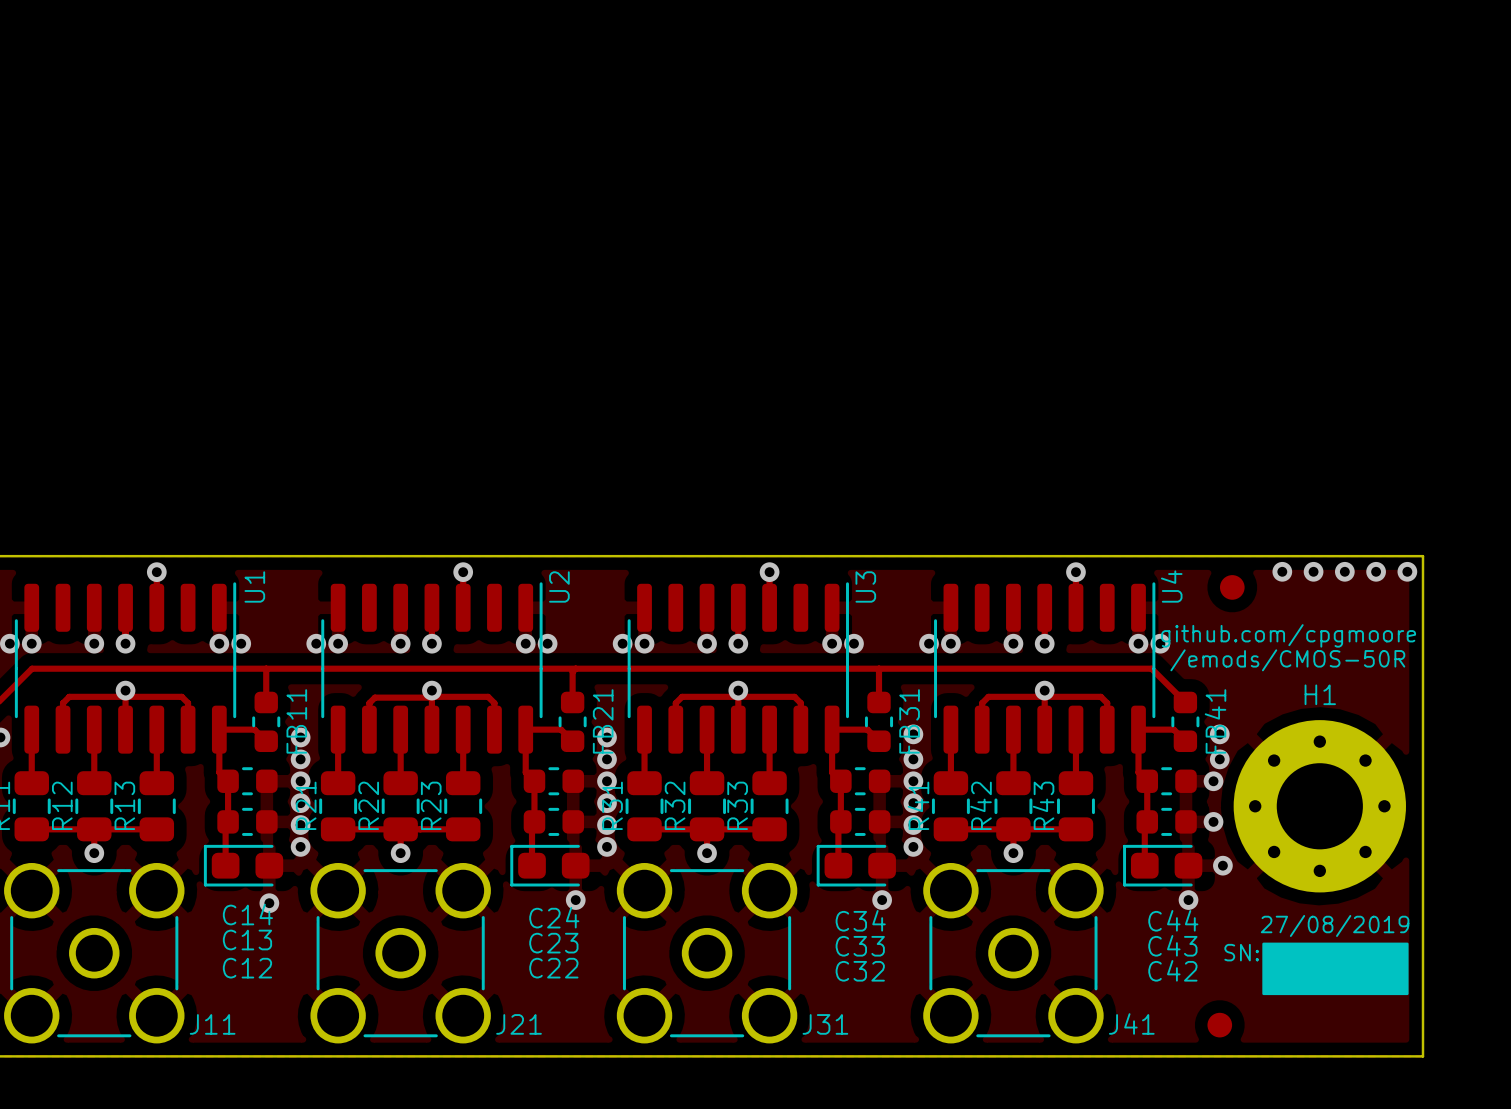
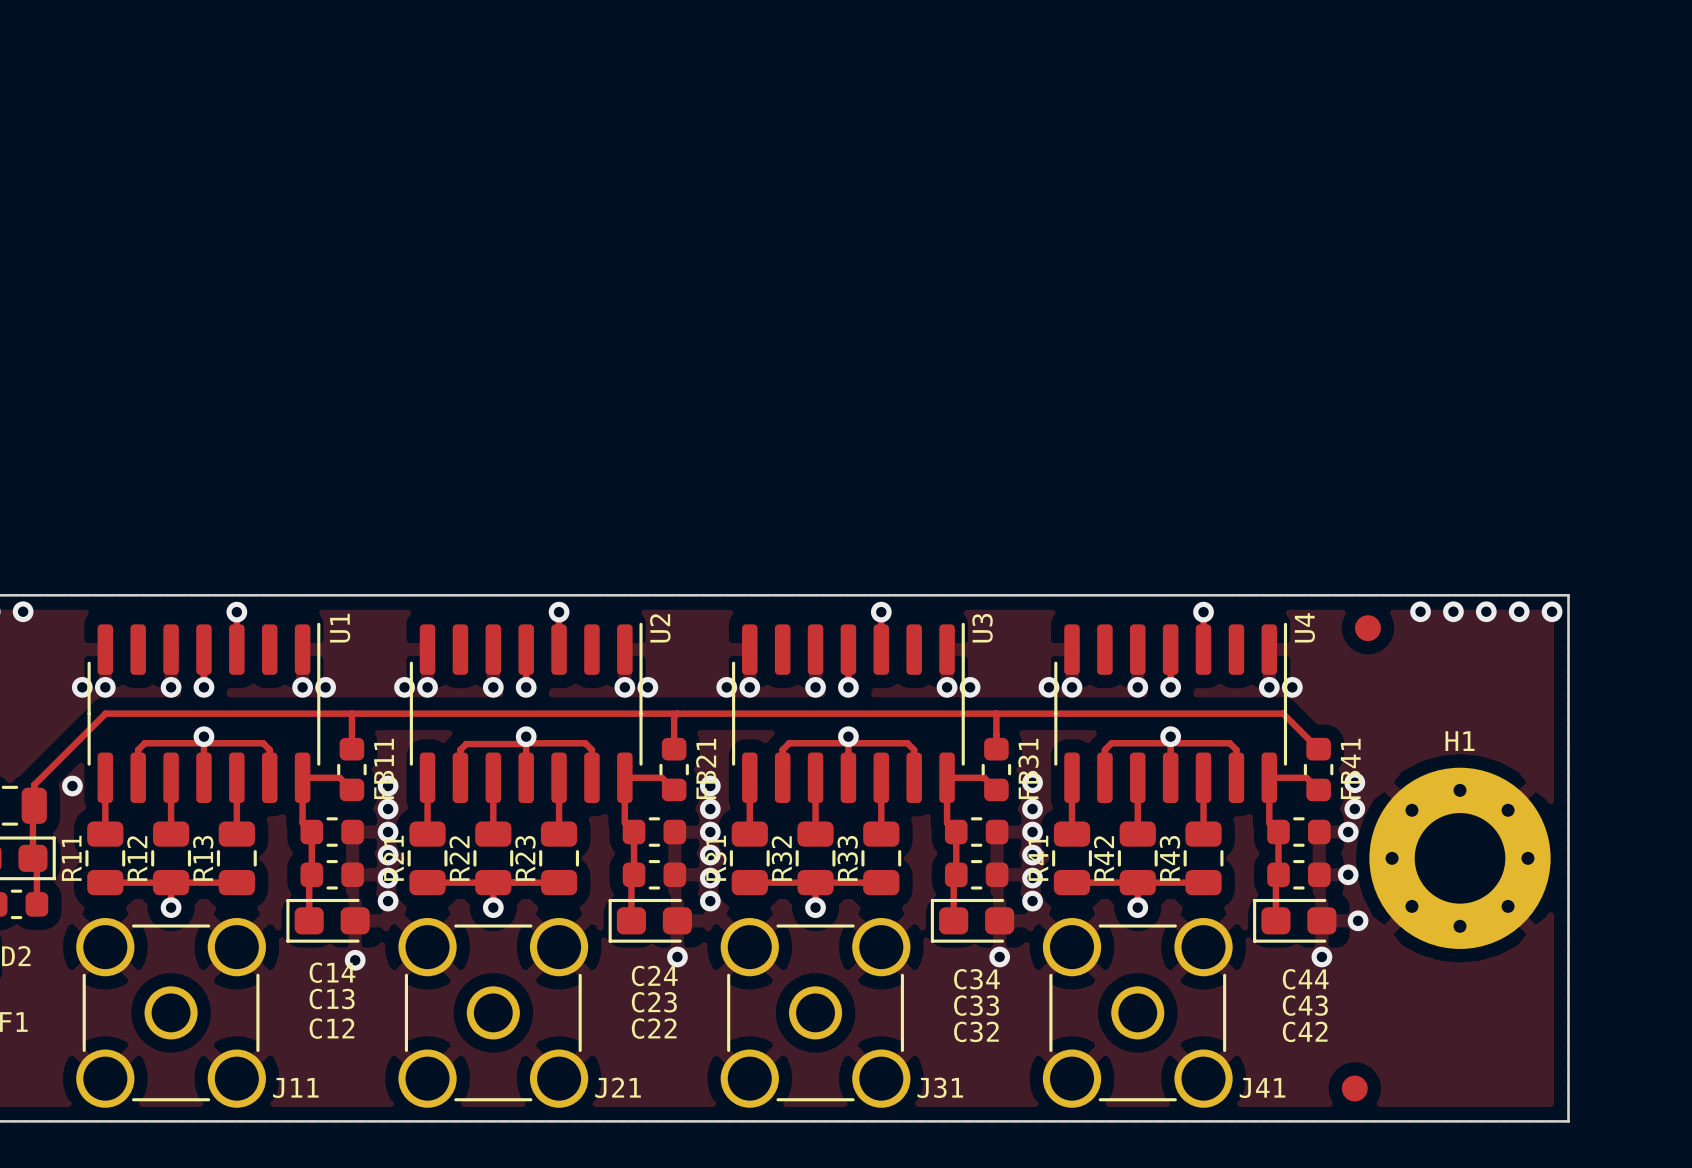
text: github.com/cpgmoore (1288, 635) -> none
text: /emods/CMOS-50R (1287, 660) -> none
text: 27/08/2019 (1335, 925) -> none
drawing: [1262, 942, 1409, 996] -> none
text: SN: (1241, 952) -> none

